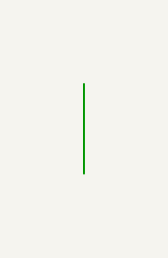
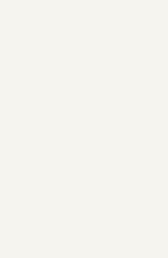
wire: (83, 83) (83, 173) -> none

